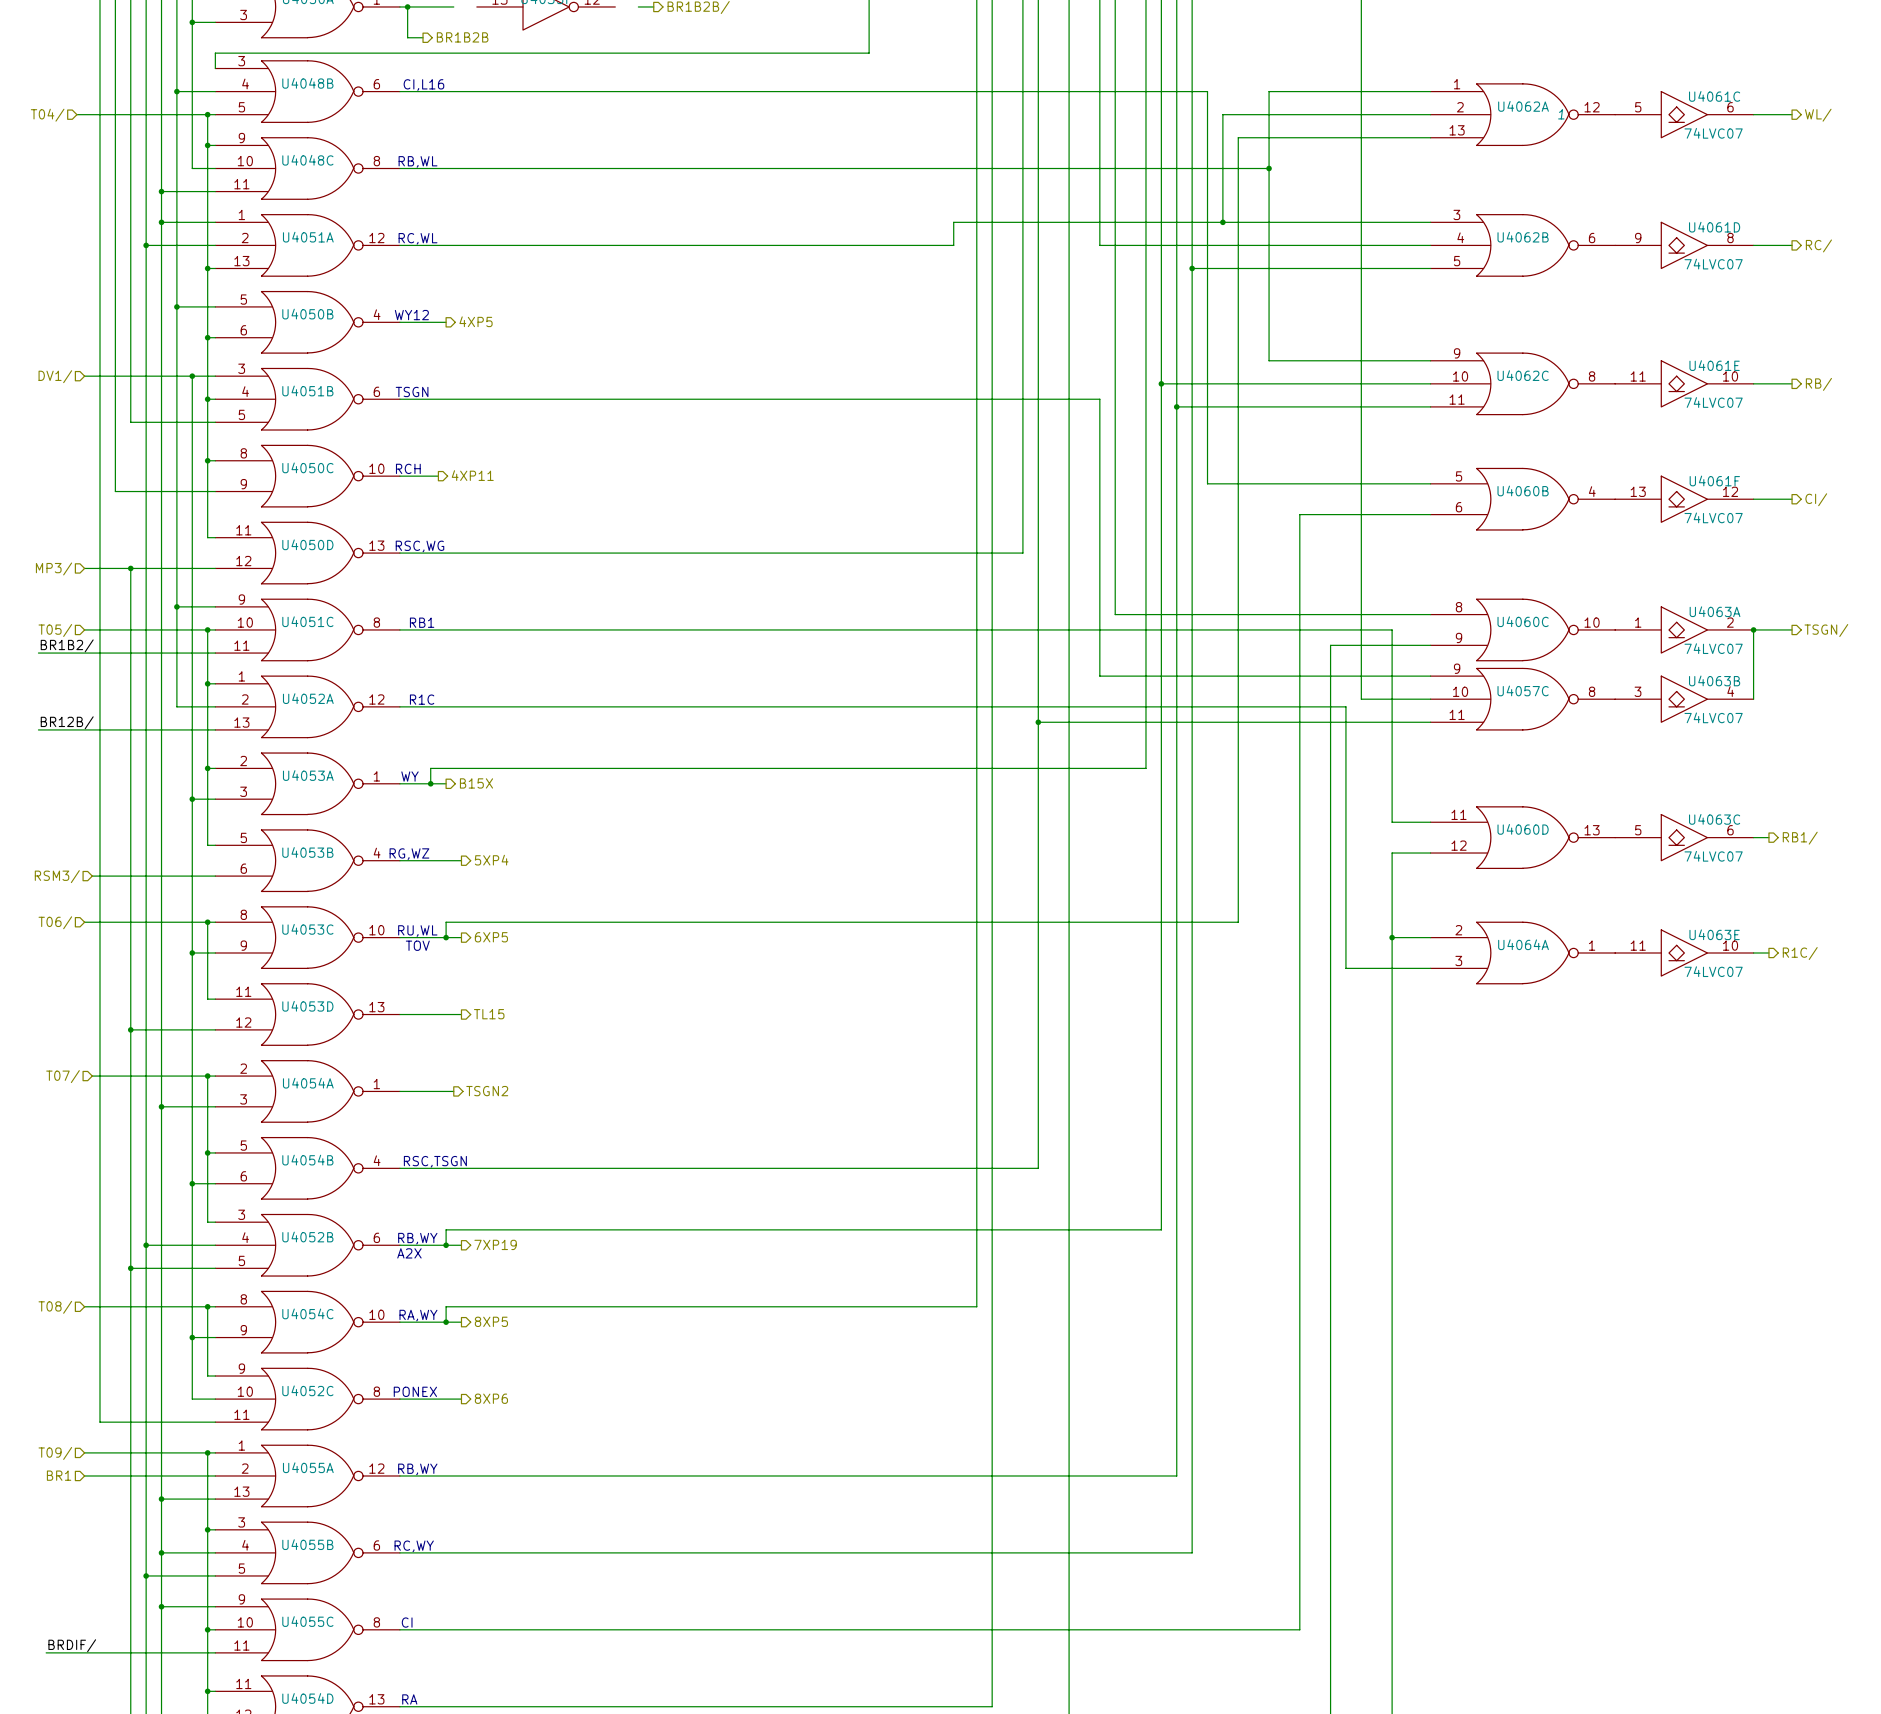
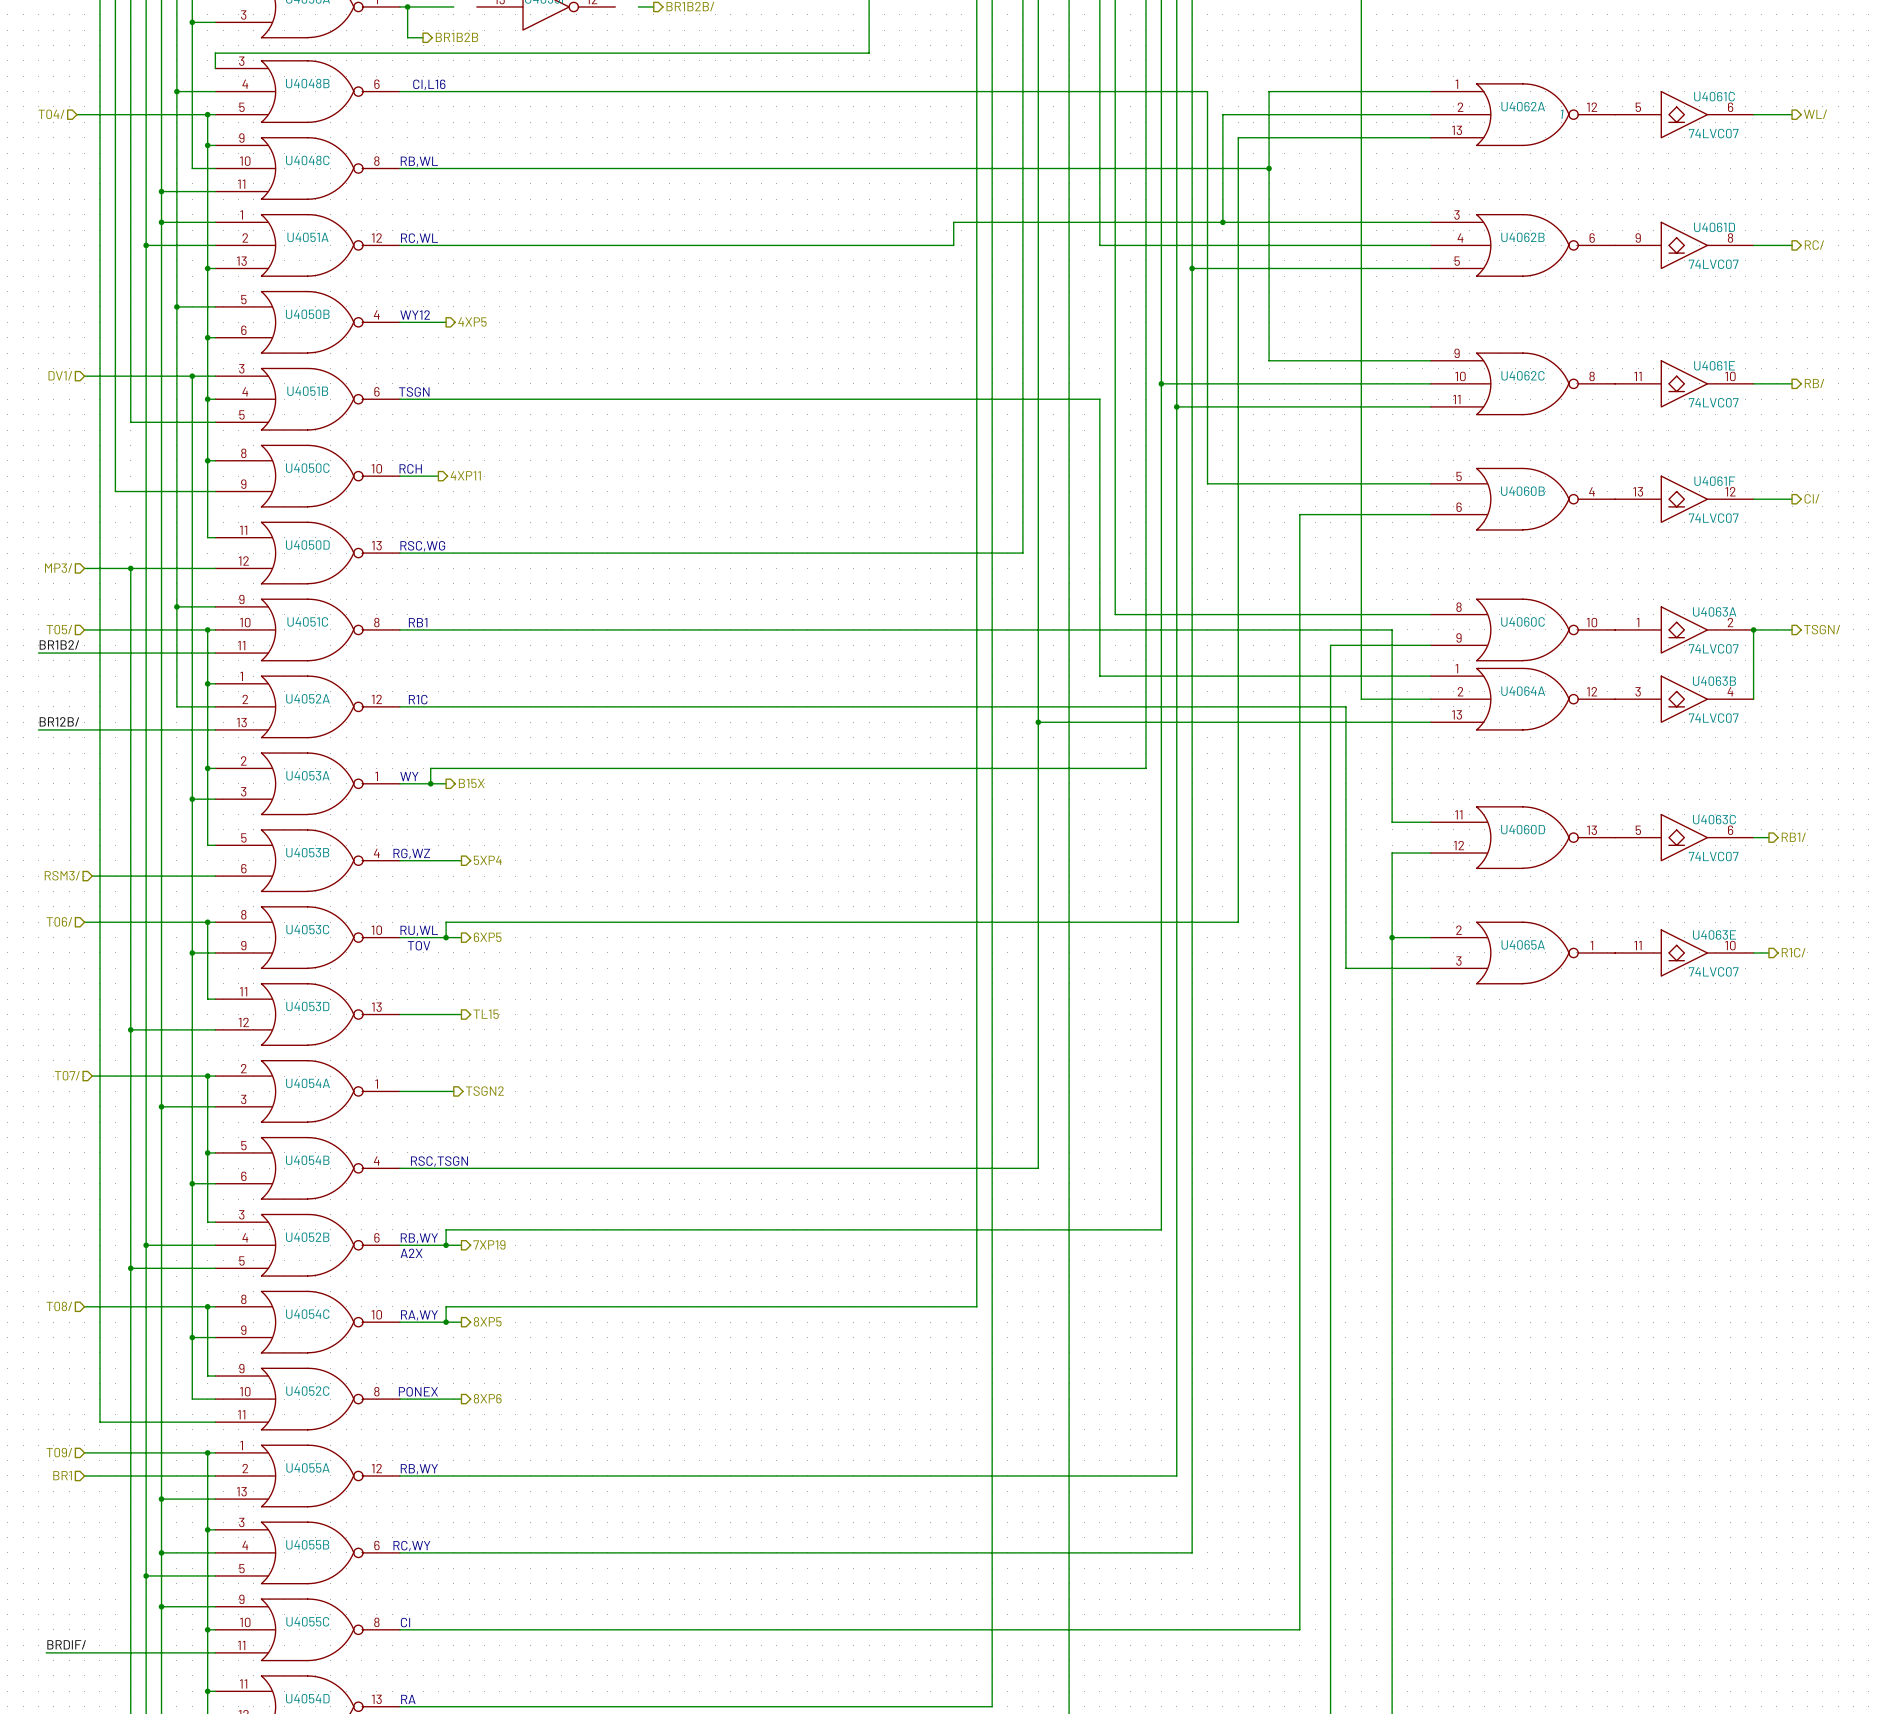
U4057C pin number: 9 (1457, 668) -> 1 (1456, 668)
U4057C name: U4057C (1523, 690) -> U4064A (1523, 691)
U4057C pin number: 10 (1460, 691) -> 2 (1460, 691)
U4057C pin number: 8 (1592, 691) -> 12 (1592, 691)
U4057C pin number: 11 (1457, 714) -> 13 (1457, 714)
U4064A name: U4064A (1523, 944) -> U4065A (1523, 944)

